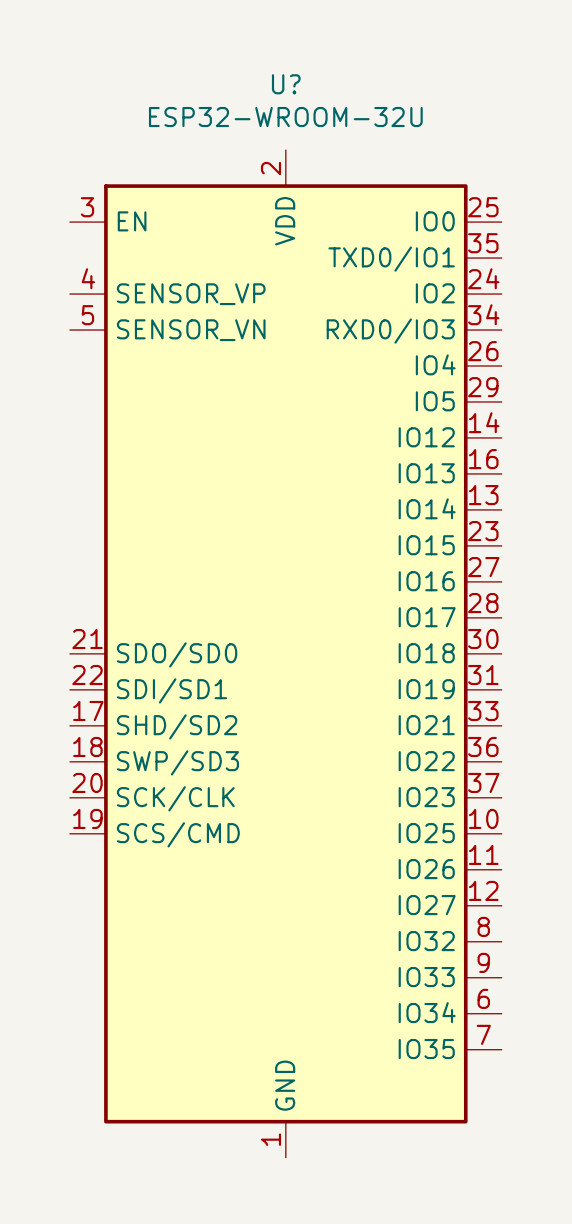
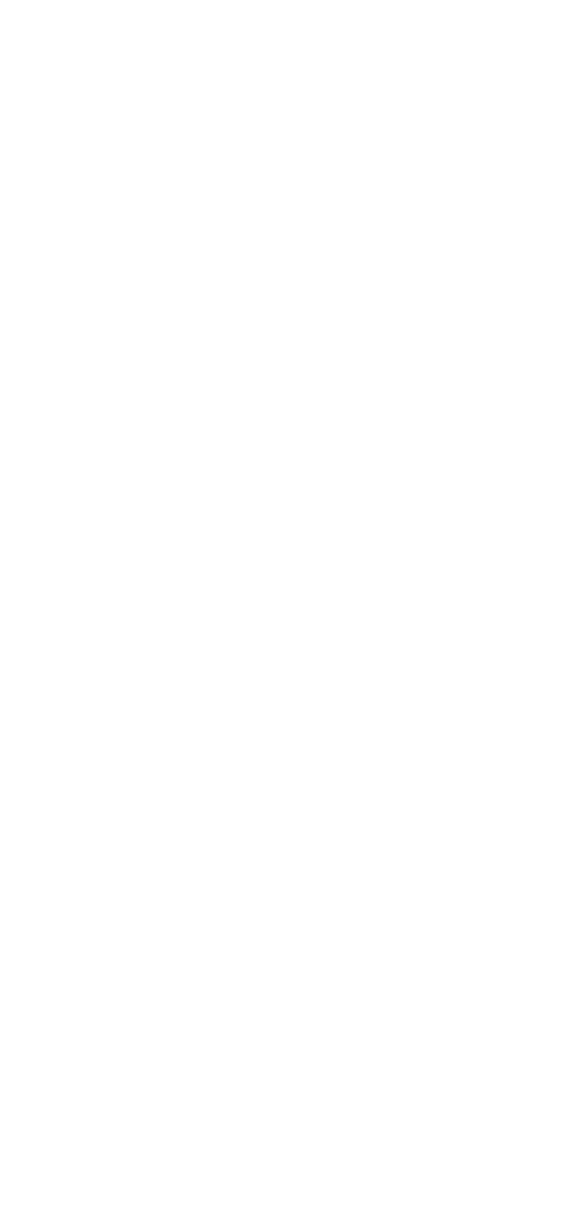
U?: ESP32-WROOM-32U (285, 653) -> none

